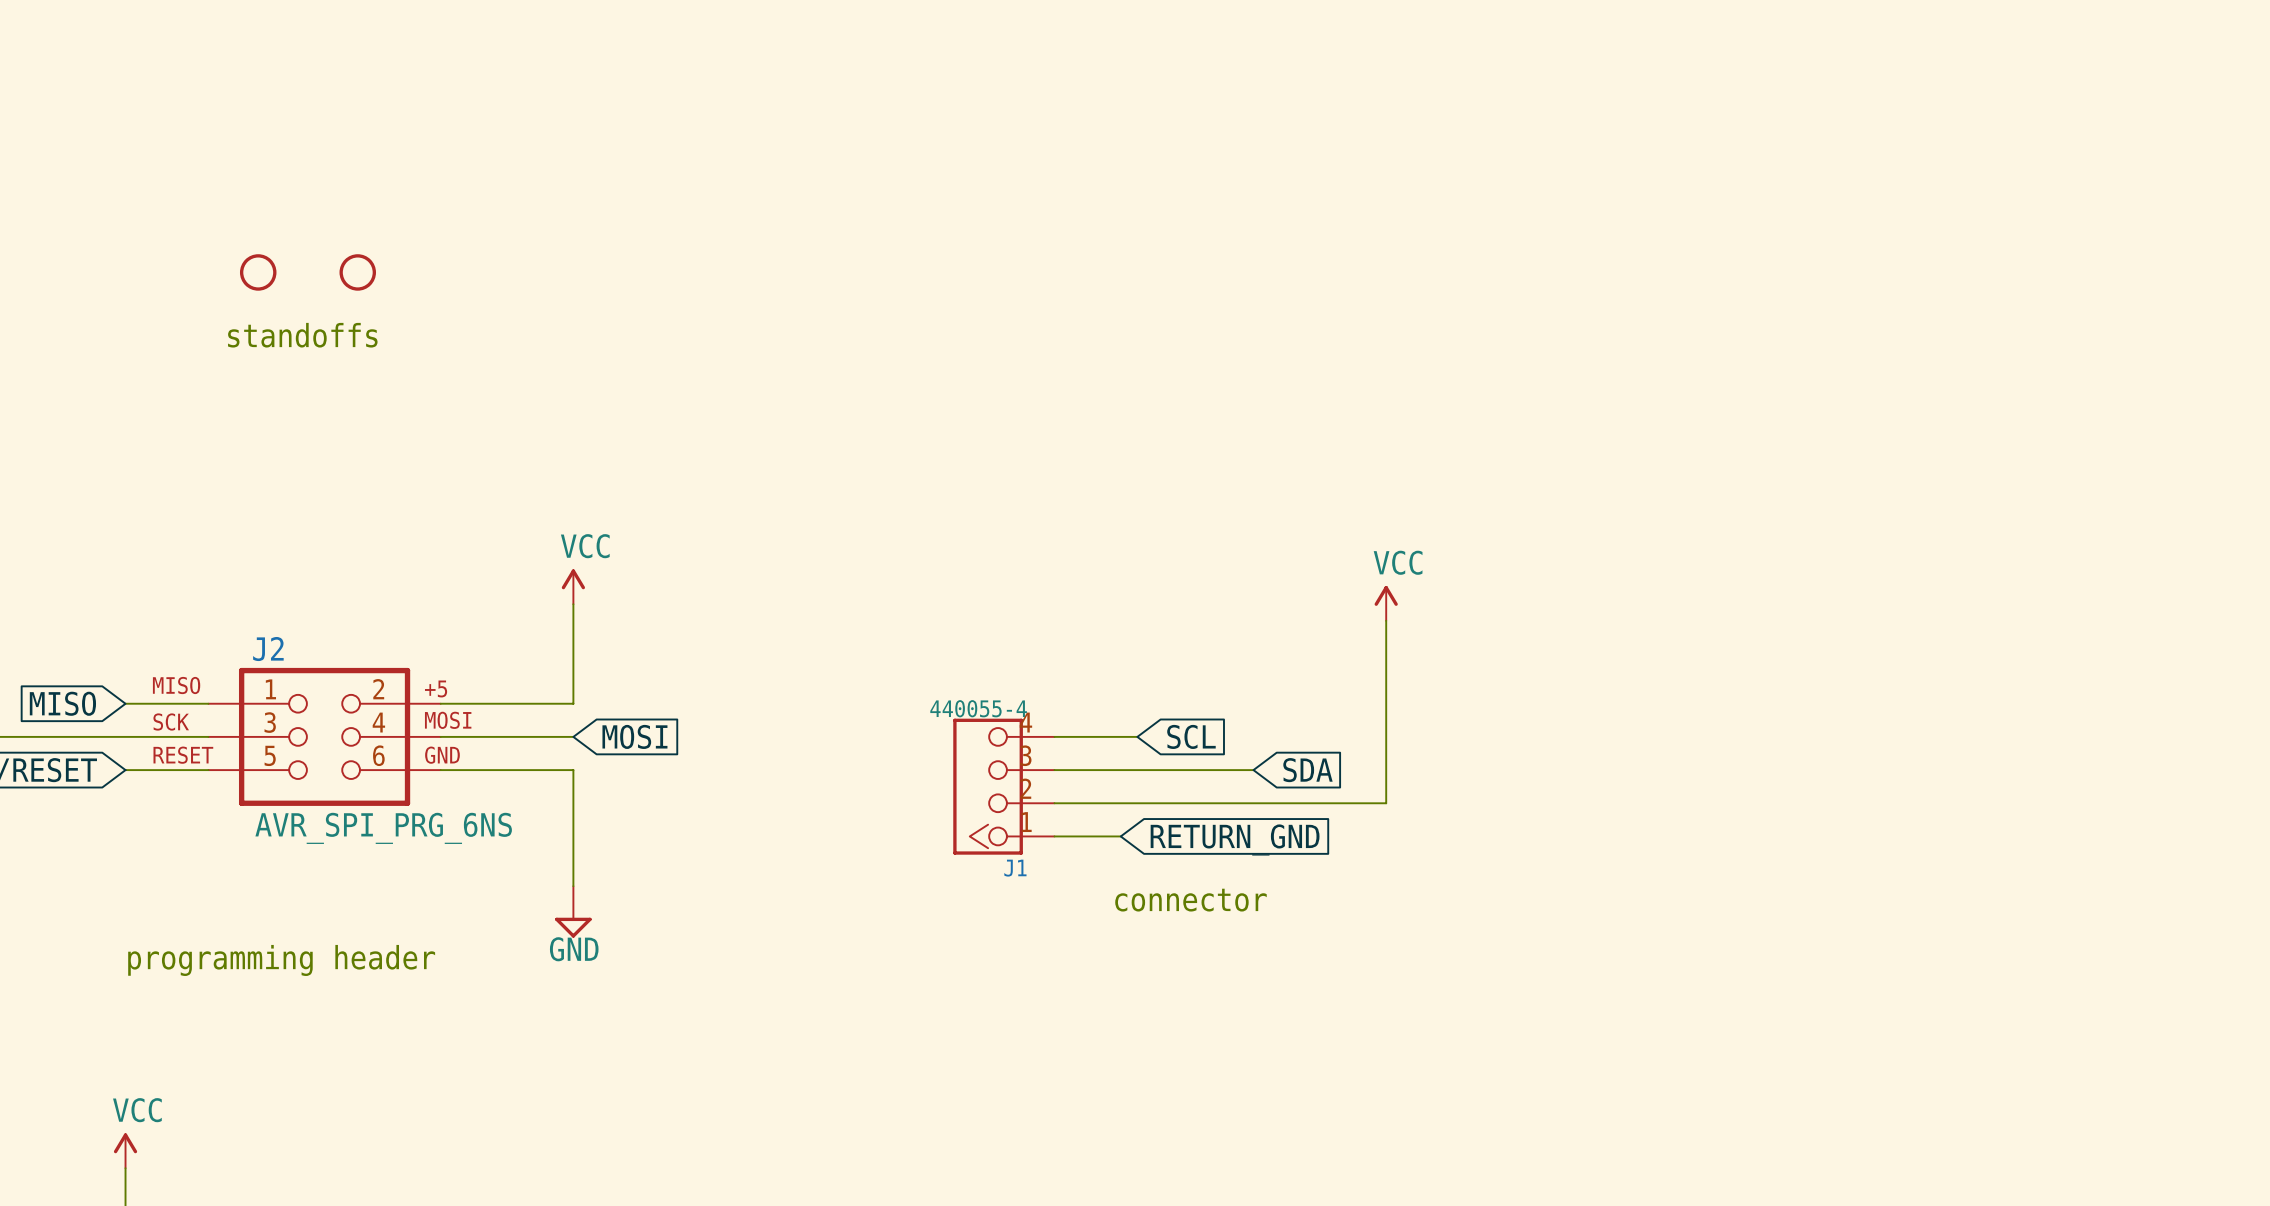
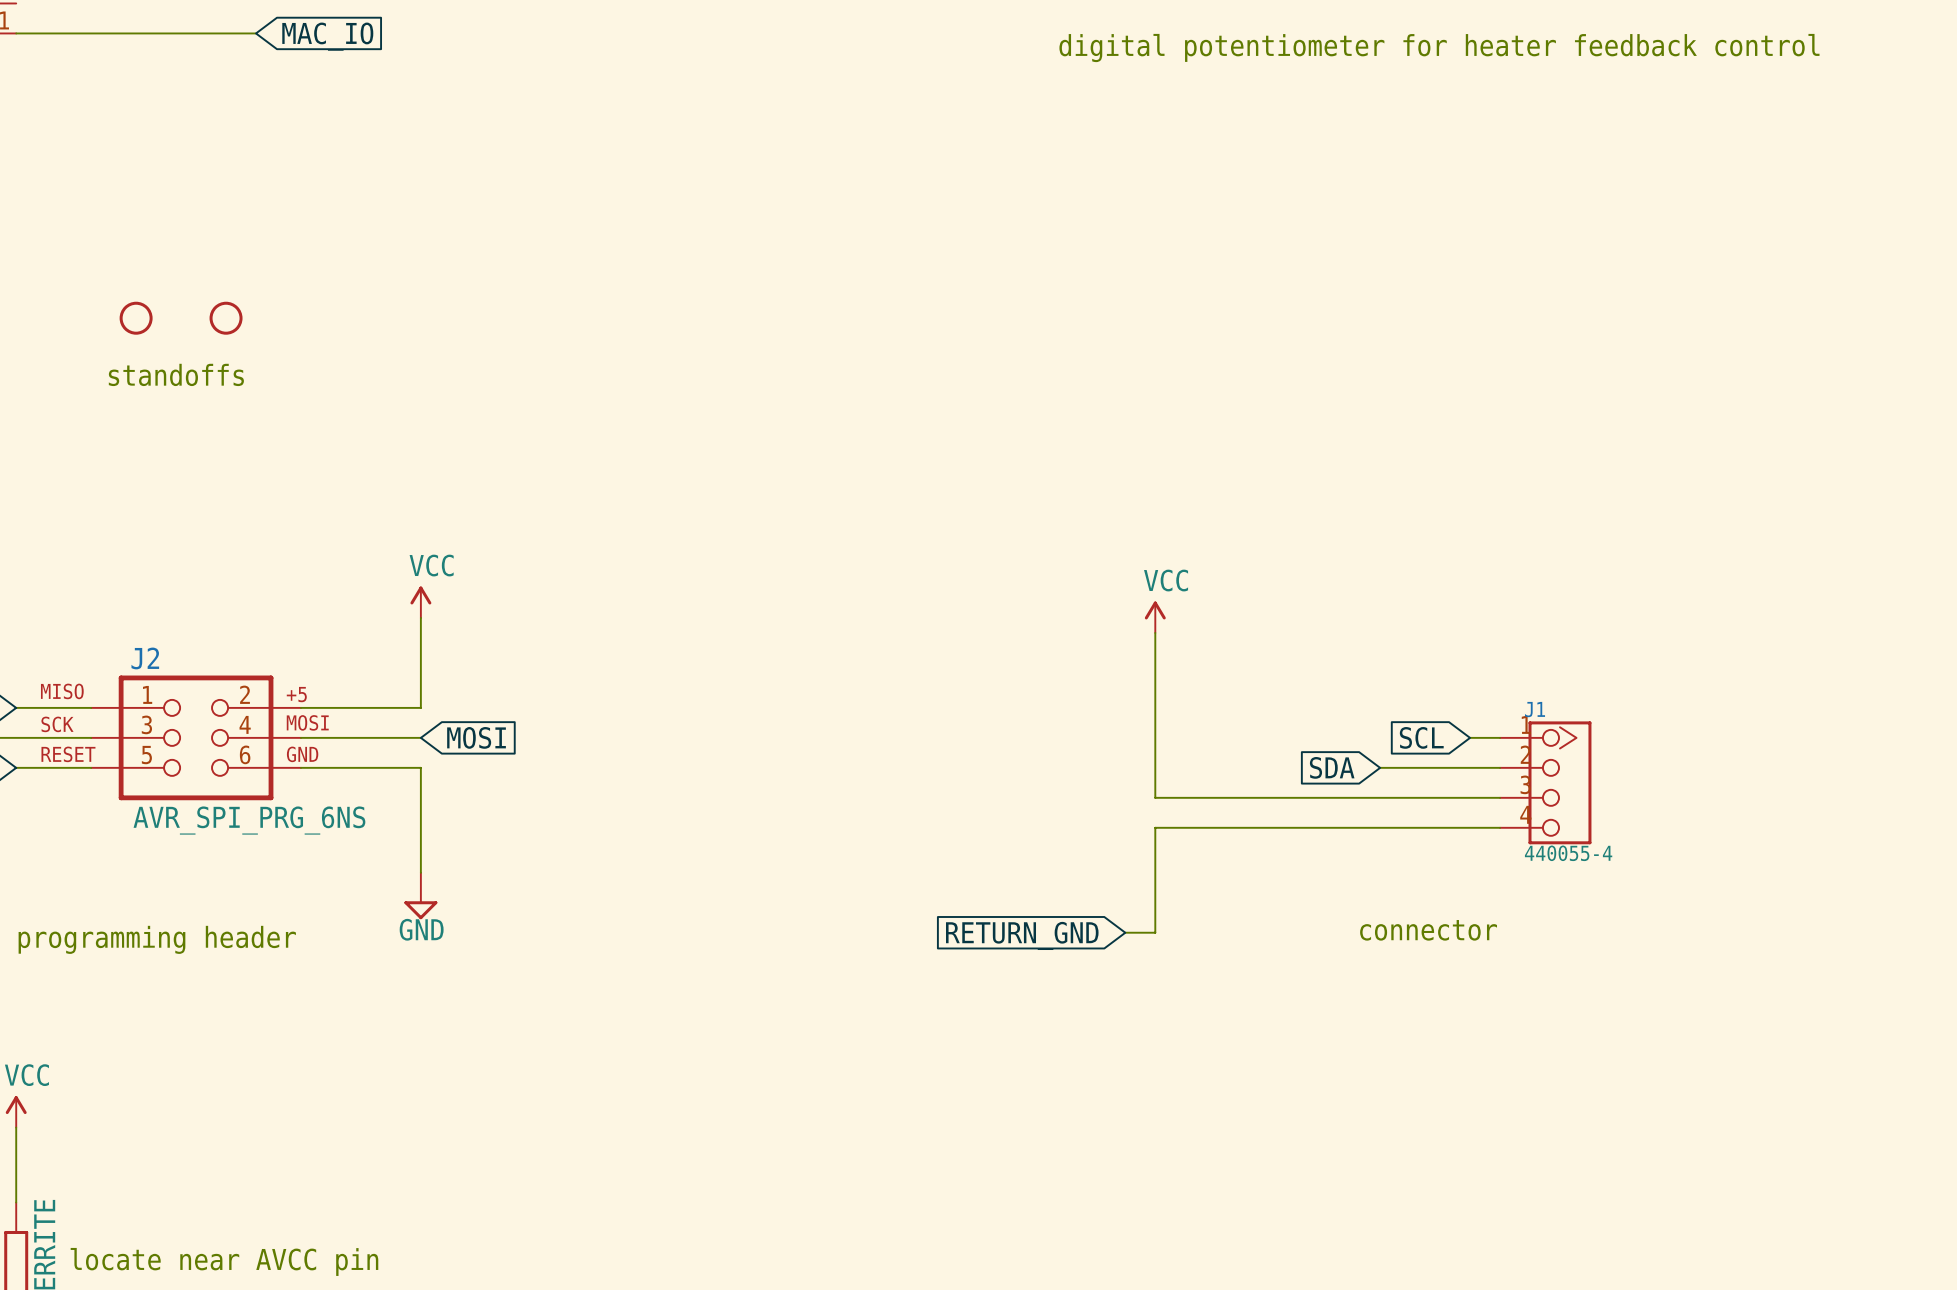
wire: (1054, 736) (1137, 736) -> none
global label: SCL (1191, 736) -> none
global label: none -> SCL (1421, 737)
wire: none -> (1470, 737) (1500, 737)
wire: (1054, 770) (1253, 770) -> none
global label: SDA (1307, 770) -> none
global label: none -> SDA (1332, 767)
wire: none -> (1380, 767) (1500, 767)
J1 rotation: 0° (988, 786) -> 180° (1559, 782)
J1 position: (1003, 786) -> (1545, 782)
wire: (1054, 803) (1386, 803) -> (1500, 797) (1155, 797)
wire: (1054, 836) (1120, 836) -> none
wire: none -> (1500, 827) (1155, 827) (1155, 932) (1125, 932)
global label rotation: 0° (1235, 839) -> 180° (1022, 935)
text: connector (1190, 900) -> none
text: none -> connector (1428, 930)

